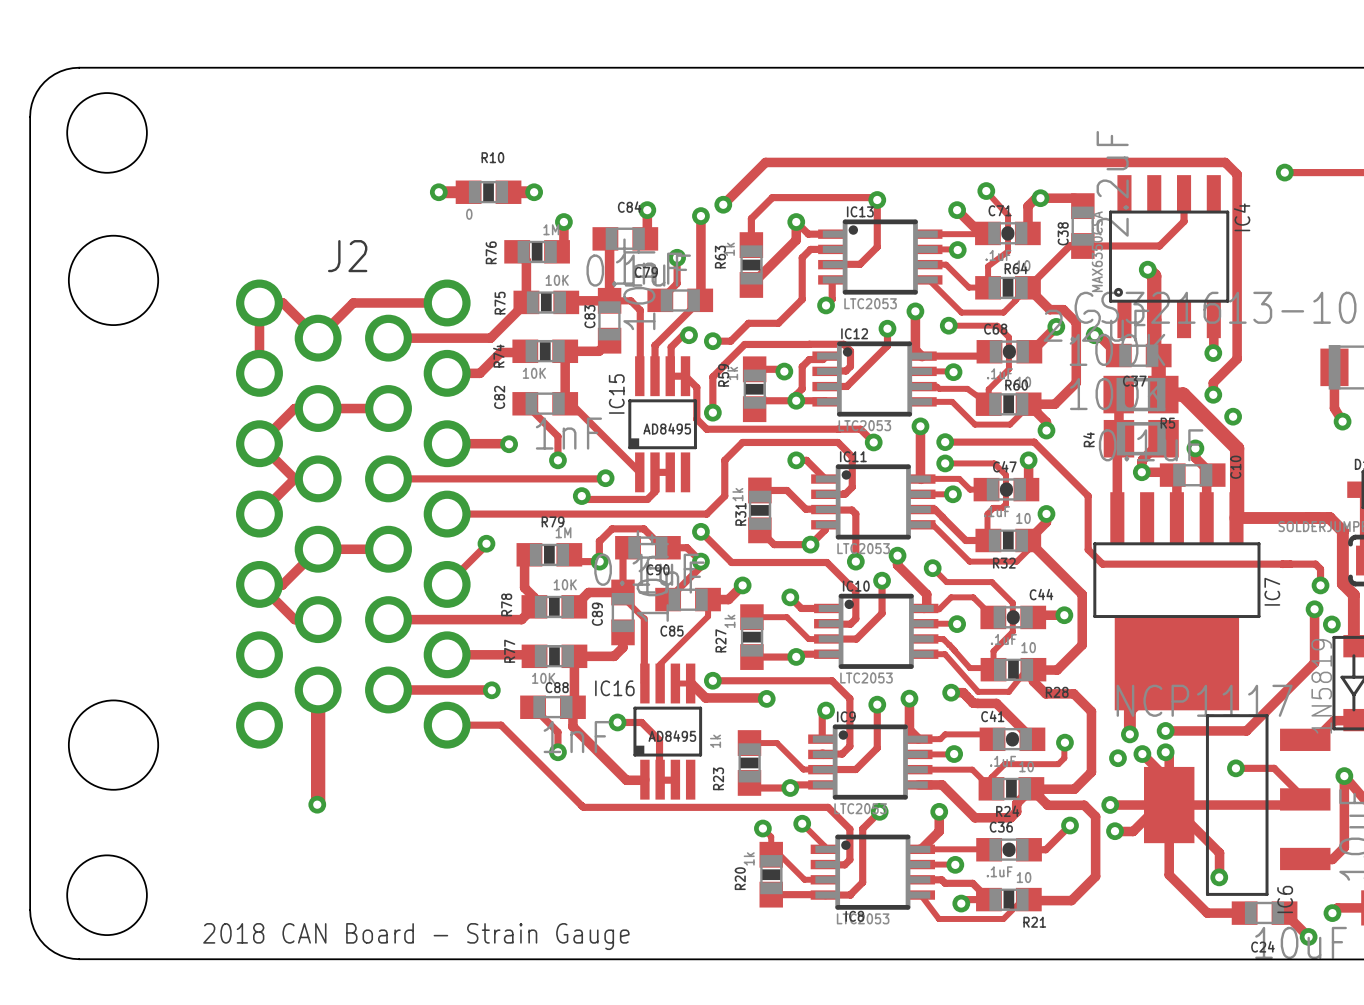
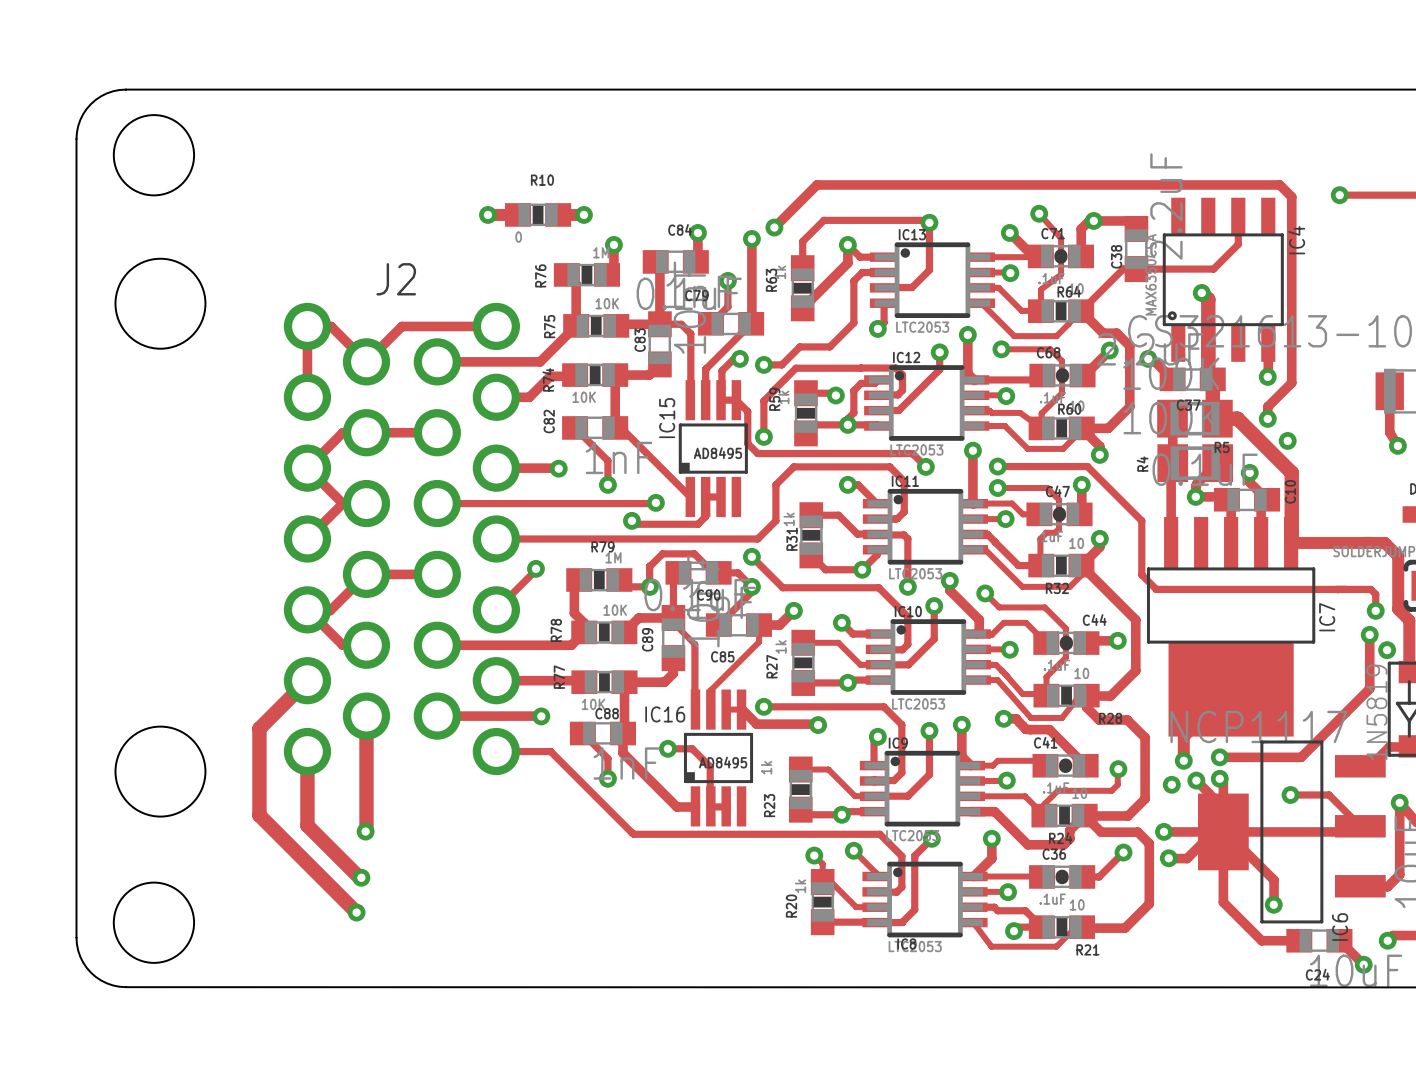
track: none -> (307, 680) (259, 728) (259, 815) (356, 912)
track: none -> (307, 751) (307, 825) (361, 877)
via: none -> (361, 877)
via: none -> (356, 912)
text: 2018 CAN Board - Strain Gauge (416, 936) -> none

